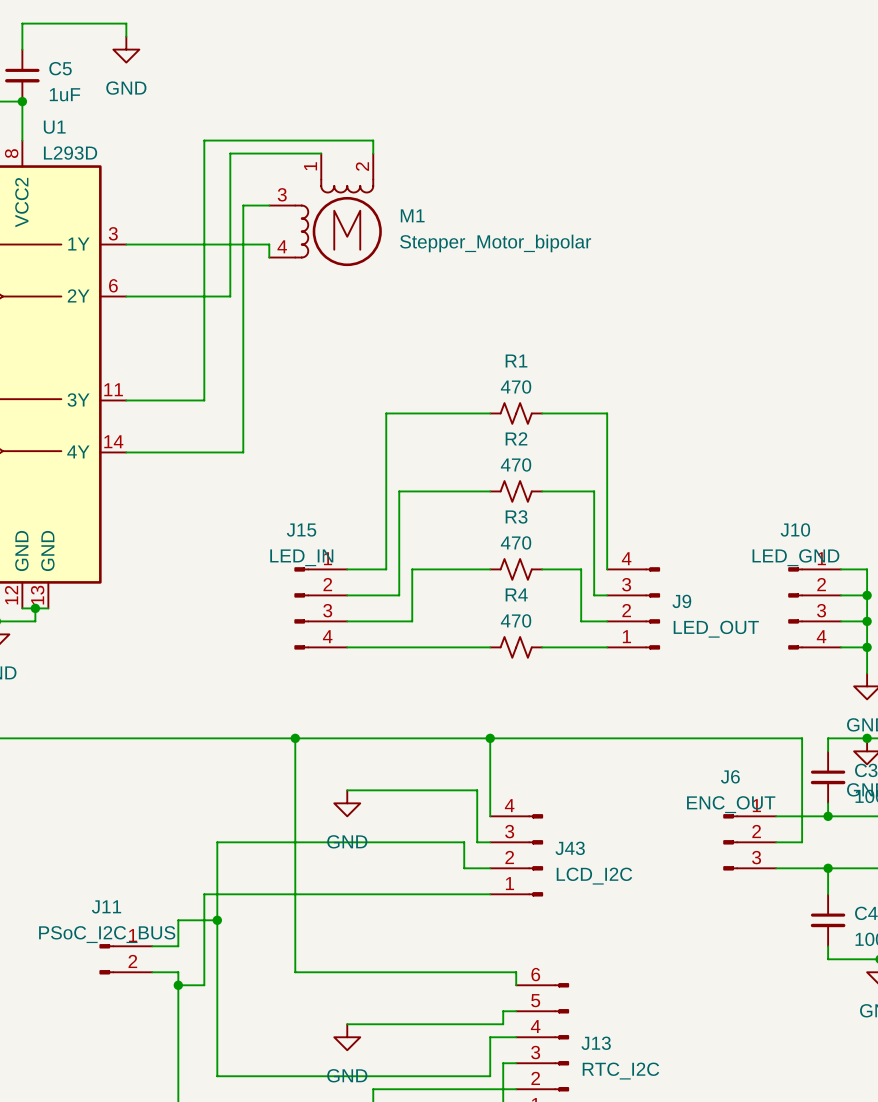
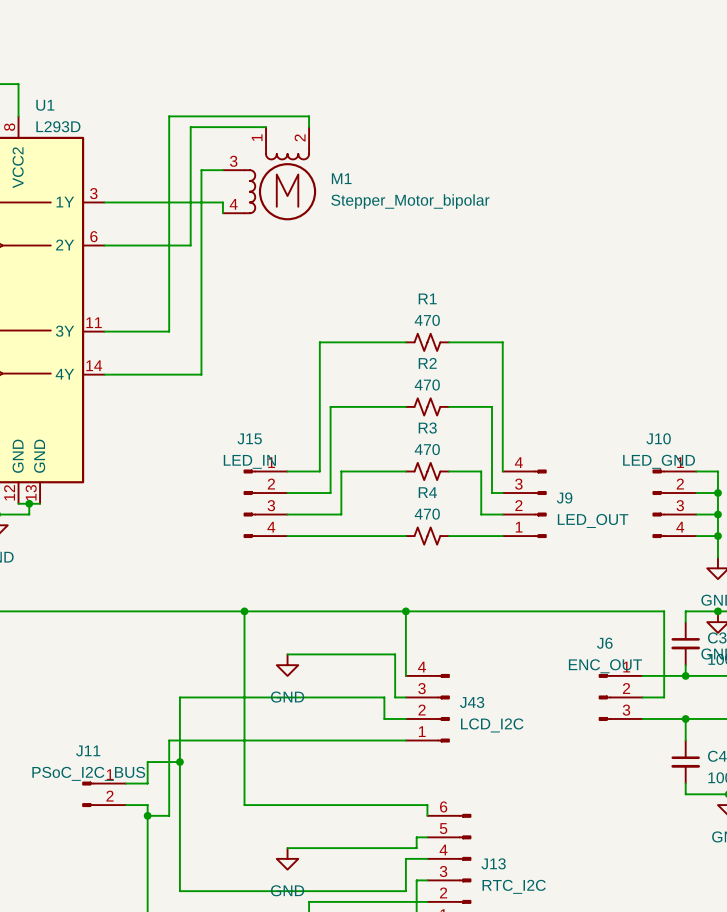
wire: (126, 36) (126, 23) (22, 23) (22, 49) -> none
power symbol: GND (126, 49) -> none
C5: 1uF (22, 75) -> none
junction: (22, 101) -> none

